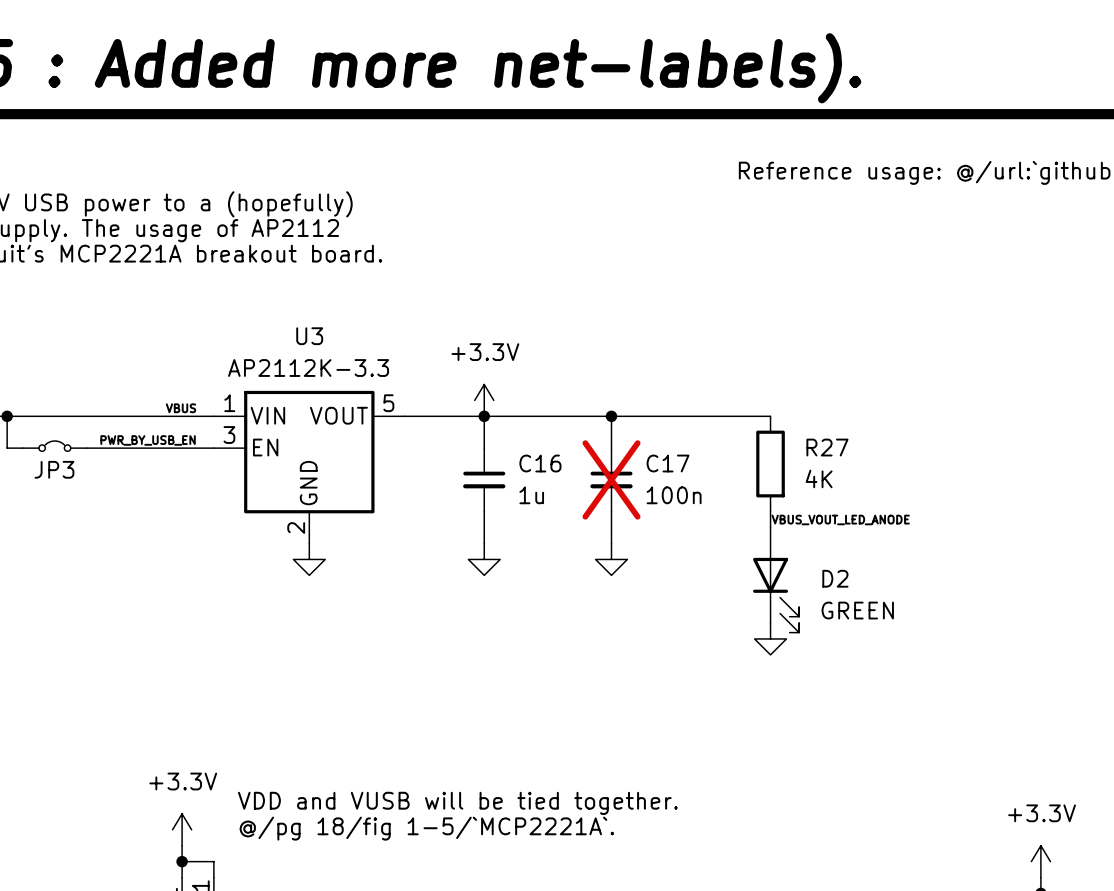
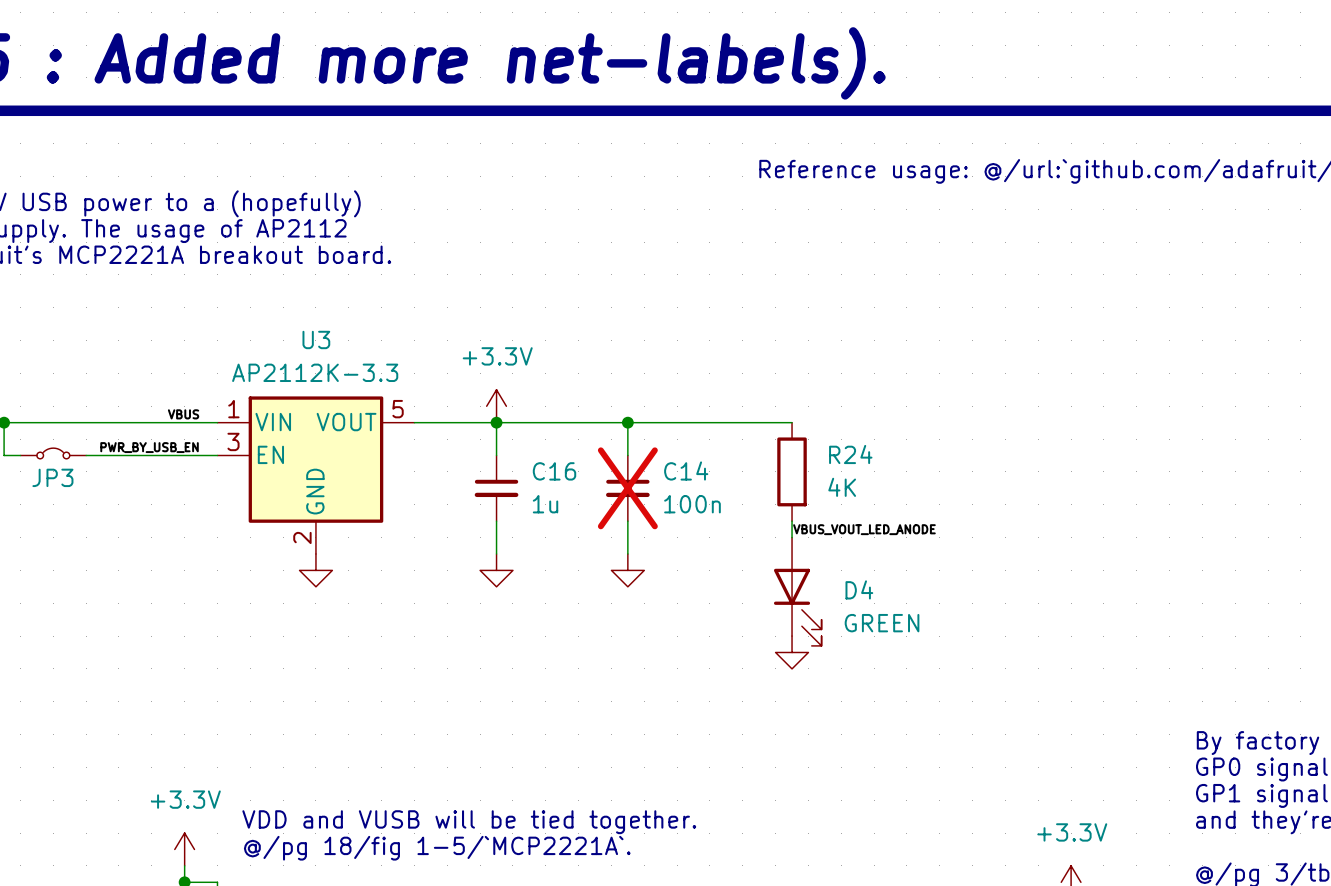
R27 name: R27 (827, 447) -> R24 (850, 454)
C17 name: C17 (668, 463) -> C14 (686, 470)
D2 name: D2 (835, 578) -> D4 (859, 589)

